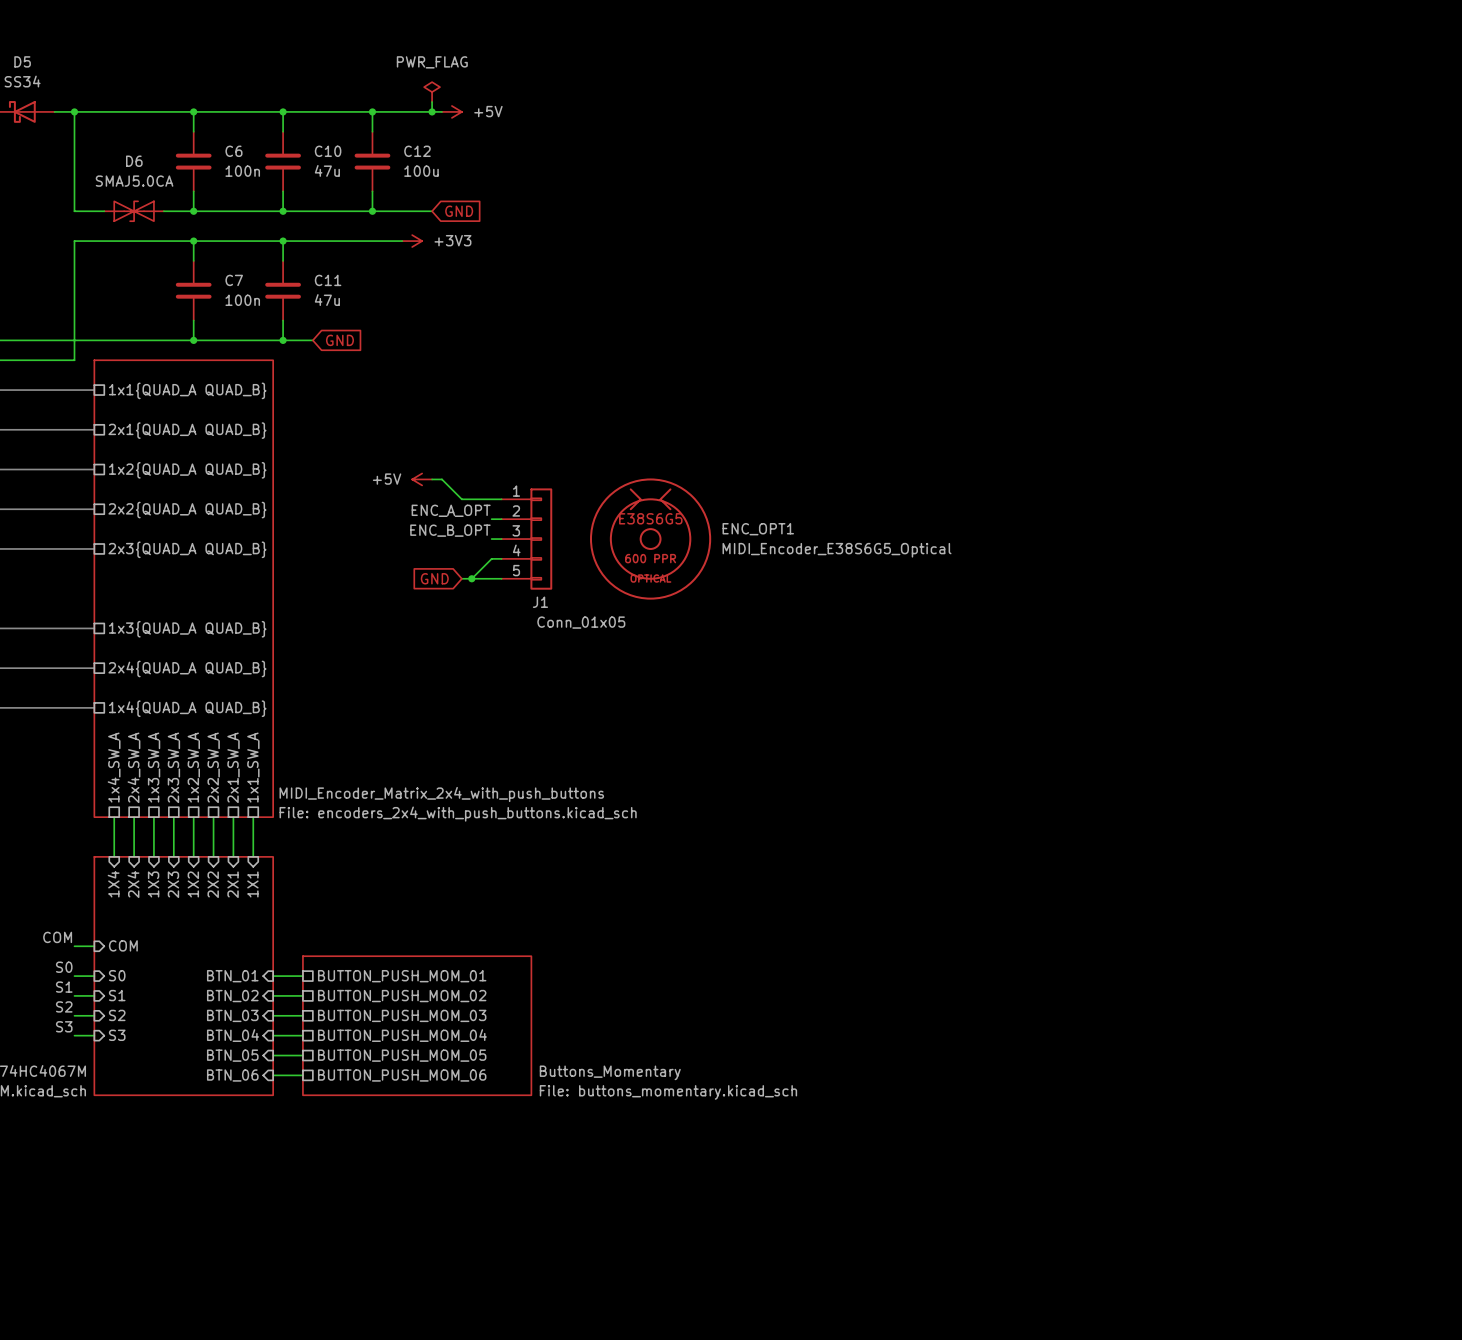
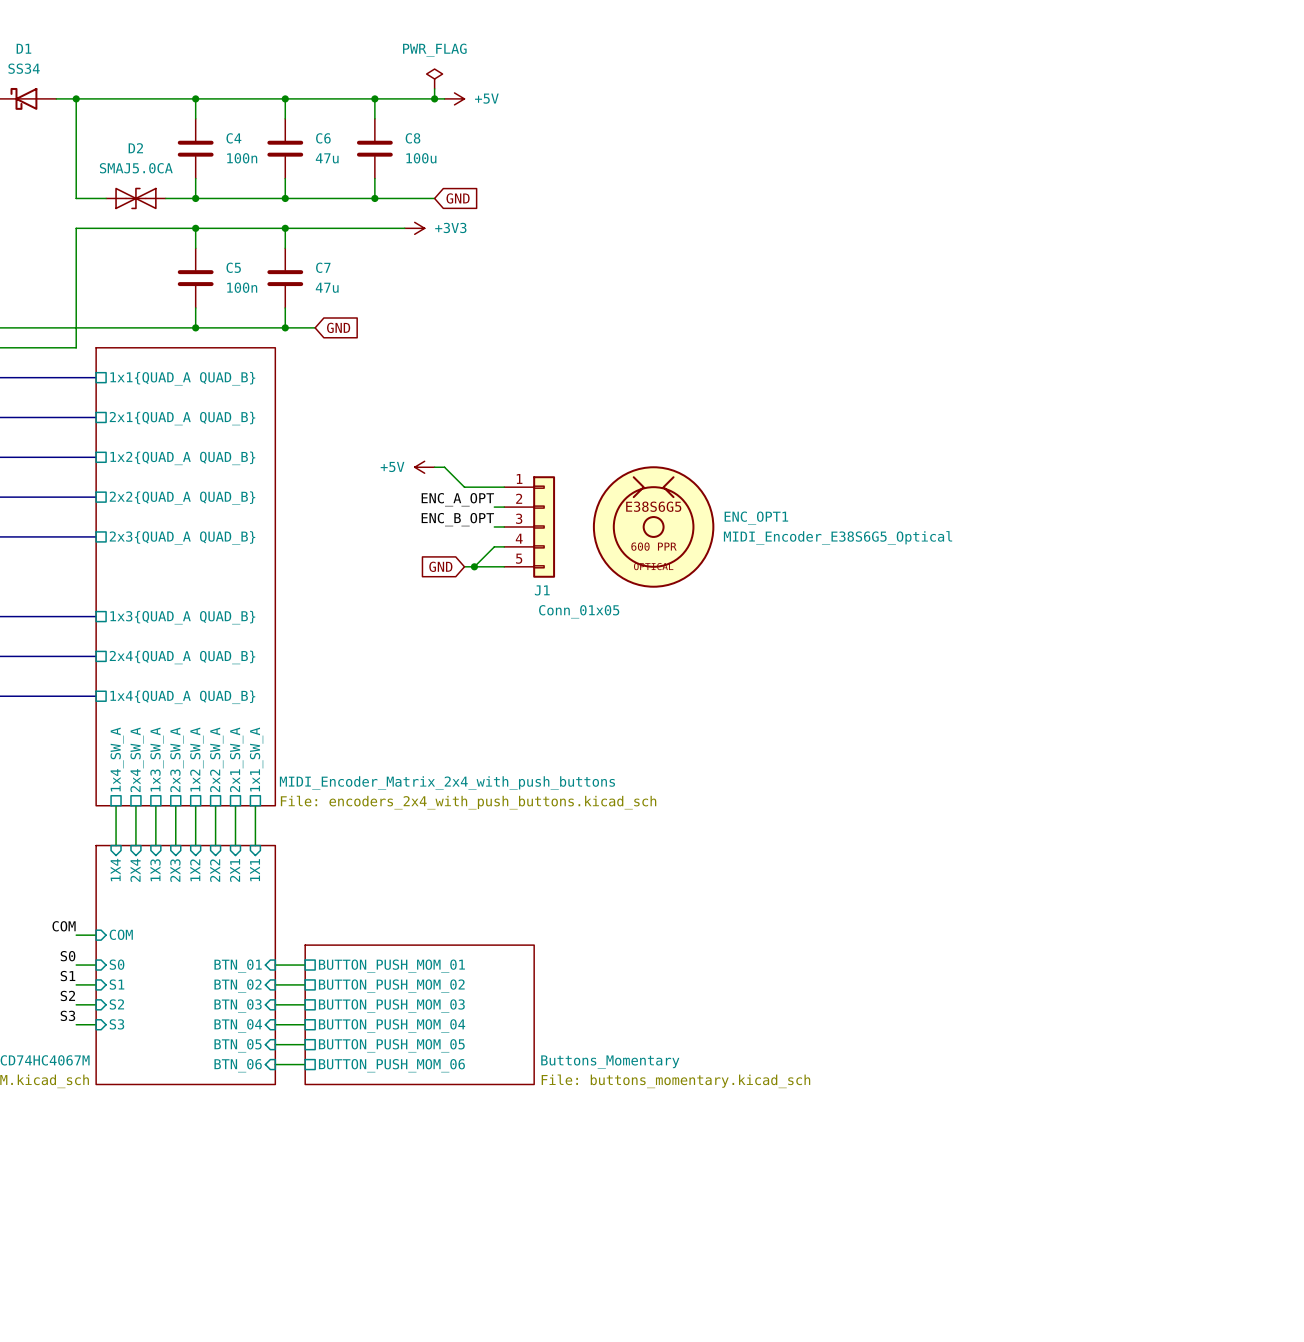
D5 name: D5 (22, 61) -> D1 (23, 48)
C6 name: C6 (233, 151) -> C4 (233, 138)
C10 name: C10 (328, 151) -> C6 (323, 138)
C12 name: C12 (417, 151) -> C8 (412, 138)
D6 name: D6 (134, 161) -> D2 (135, 148)
C7 name: C7 (234, 280) -> C5 (233, 267)
C11 name: C11 (328, 280) -> C7 (323, 267)

